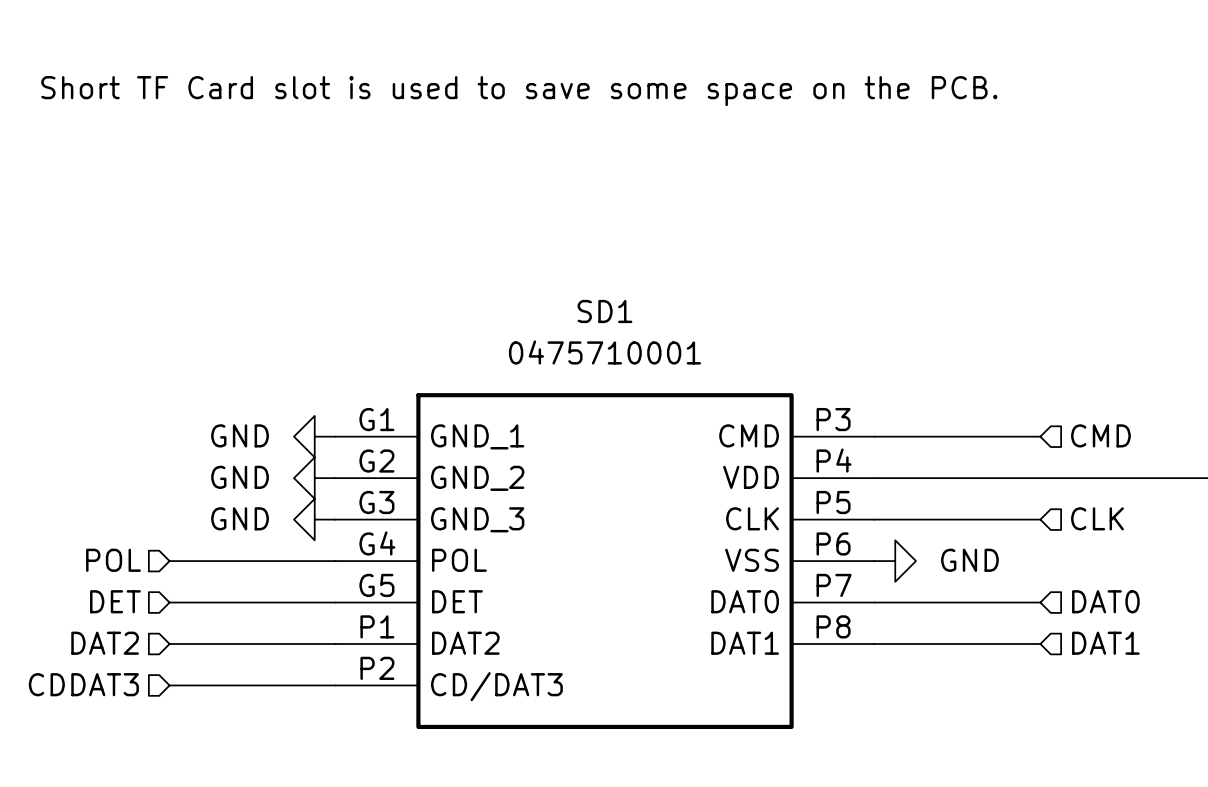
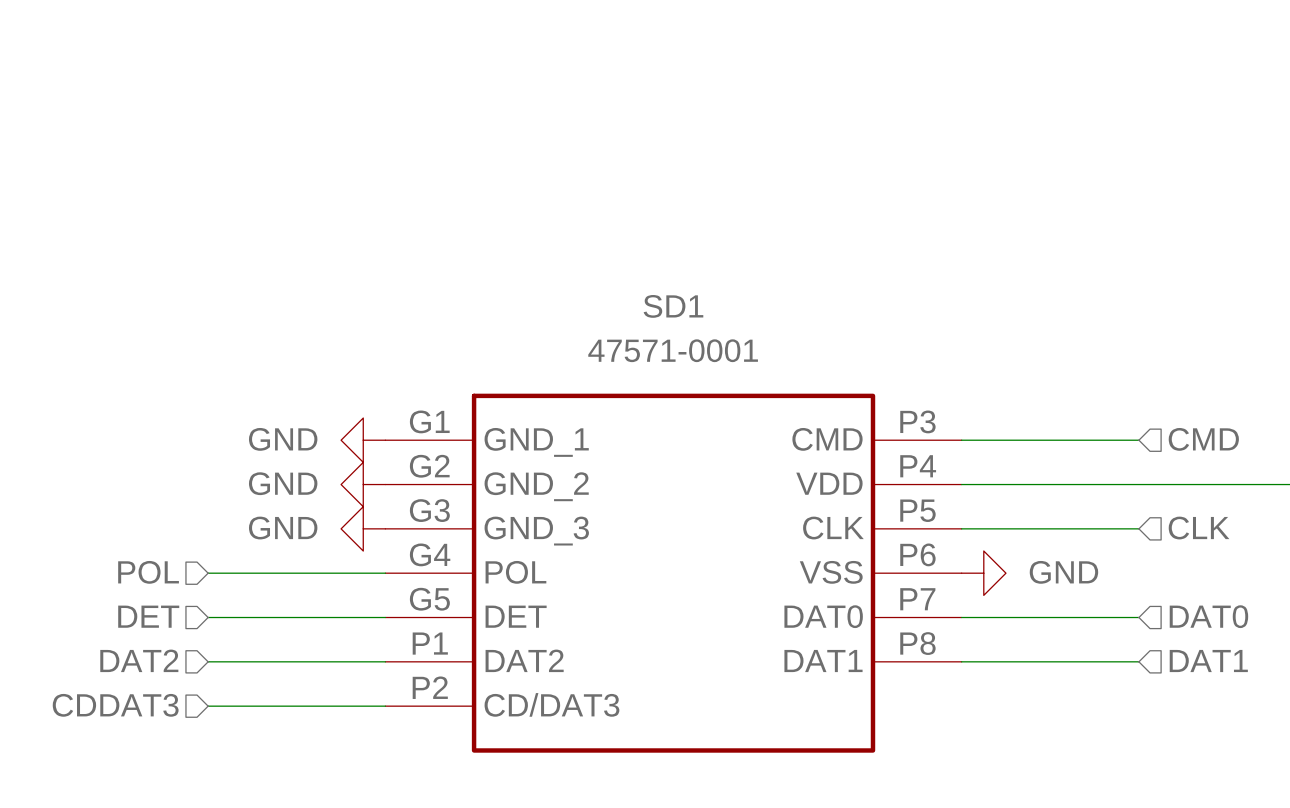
text: Short TF Card slot is used to save some space on the PCB. (519, 91) -> none
SD1 value: 0475710001 (604, 352) -> 47571-0001 (673, 350)

